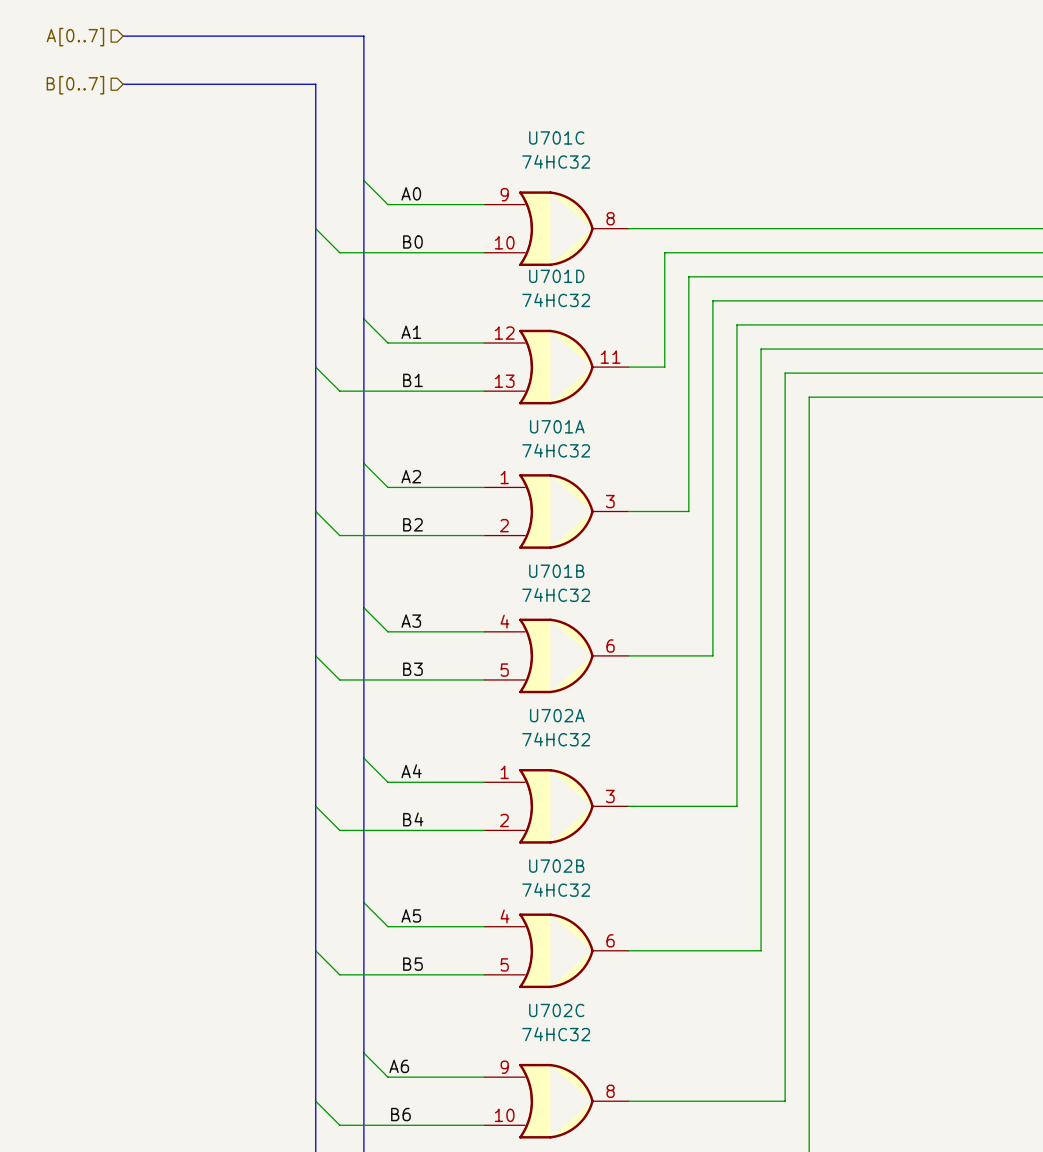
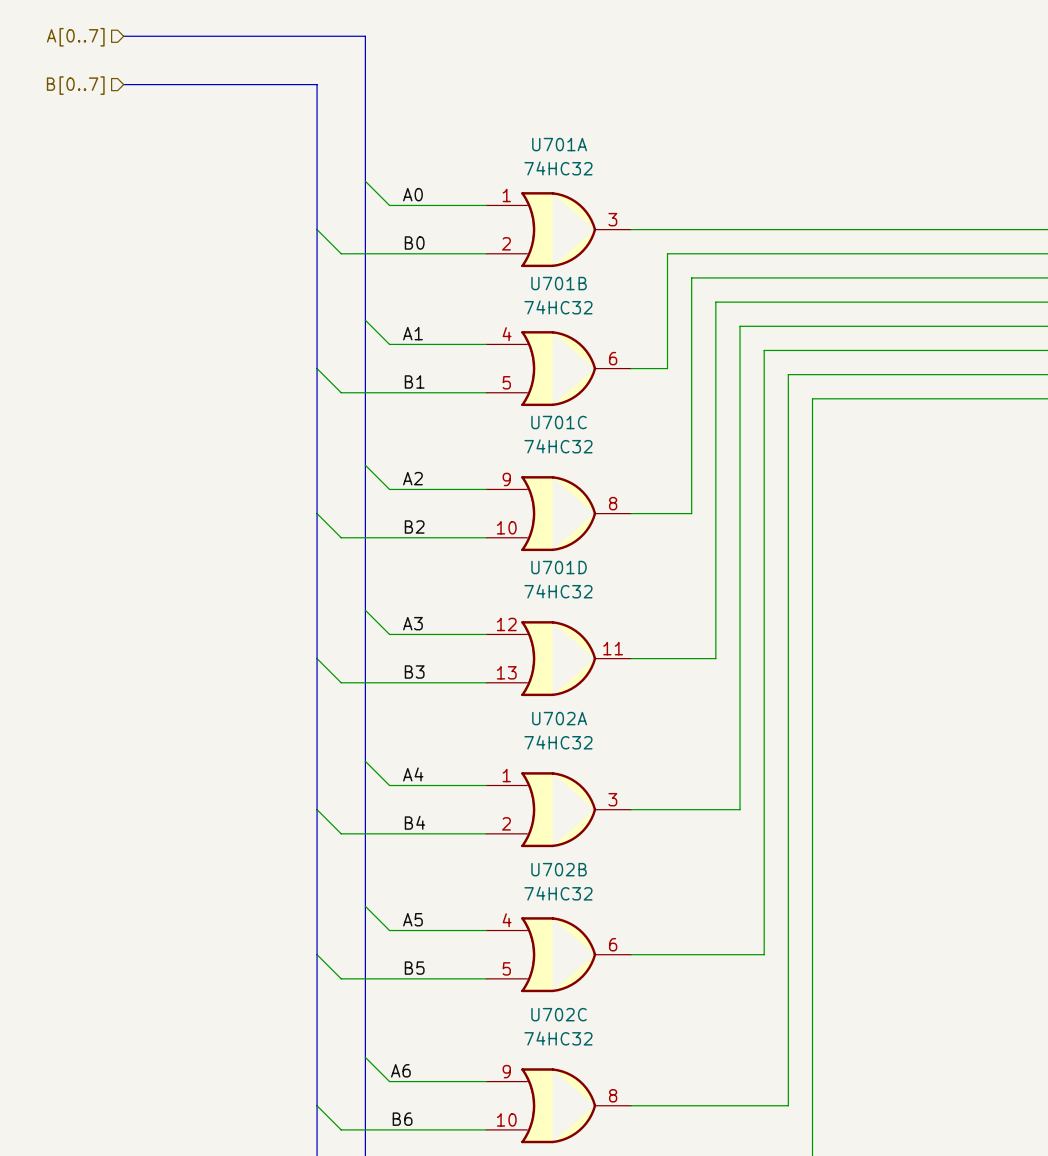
U701C position: (556, 228) -> (558, 513)
U701D position: (556, 367) -> (558, 658)
U701A position: (556, 511) -> (558, 229)
U701B position: (556, 655) -> (558, 368)

